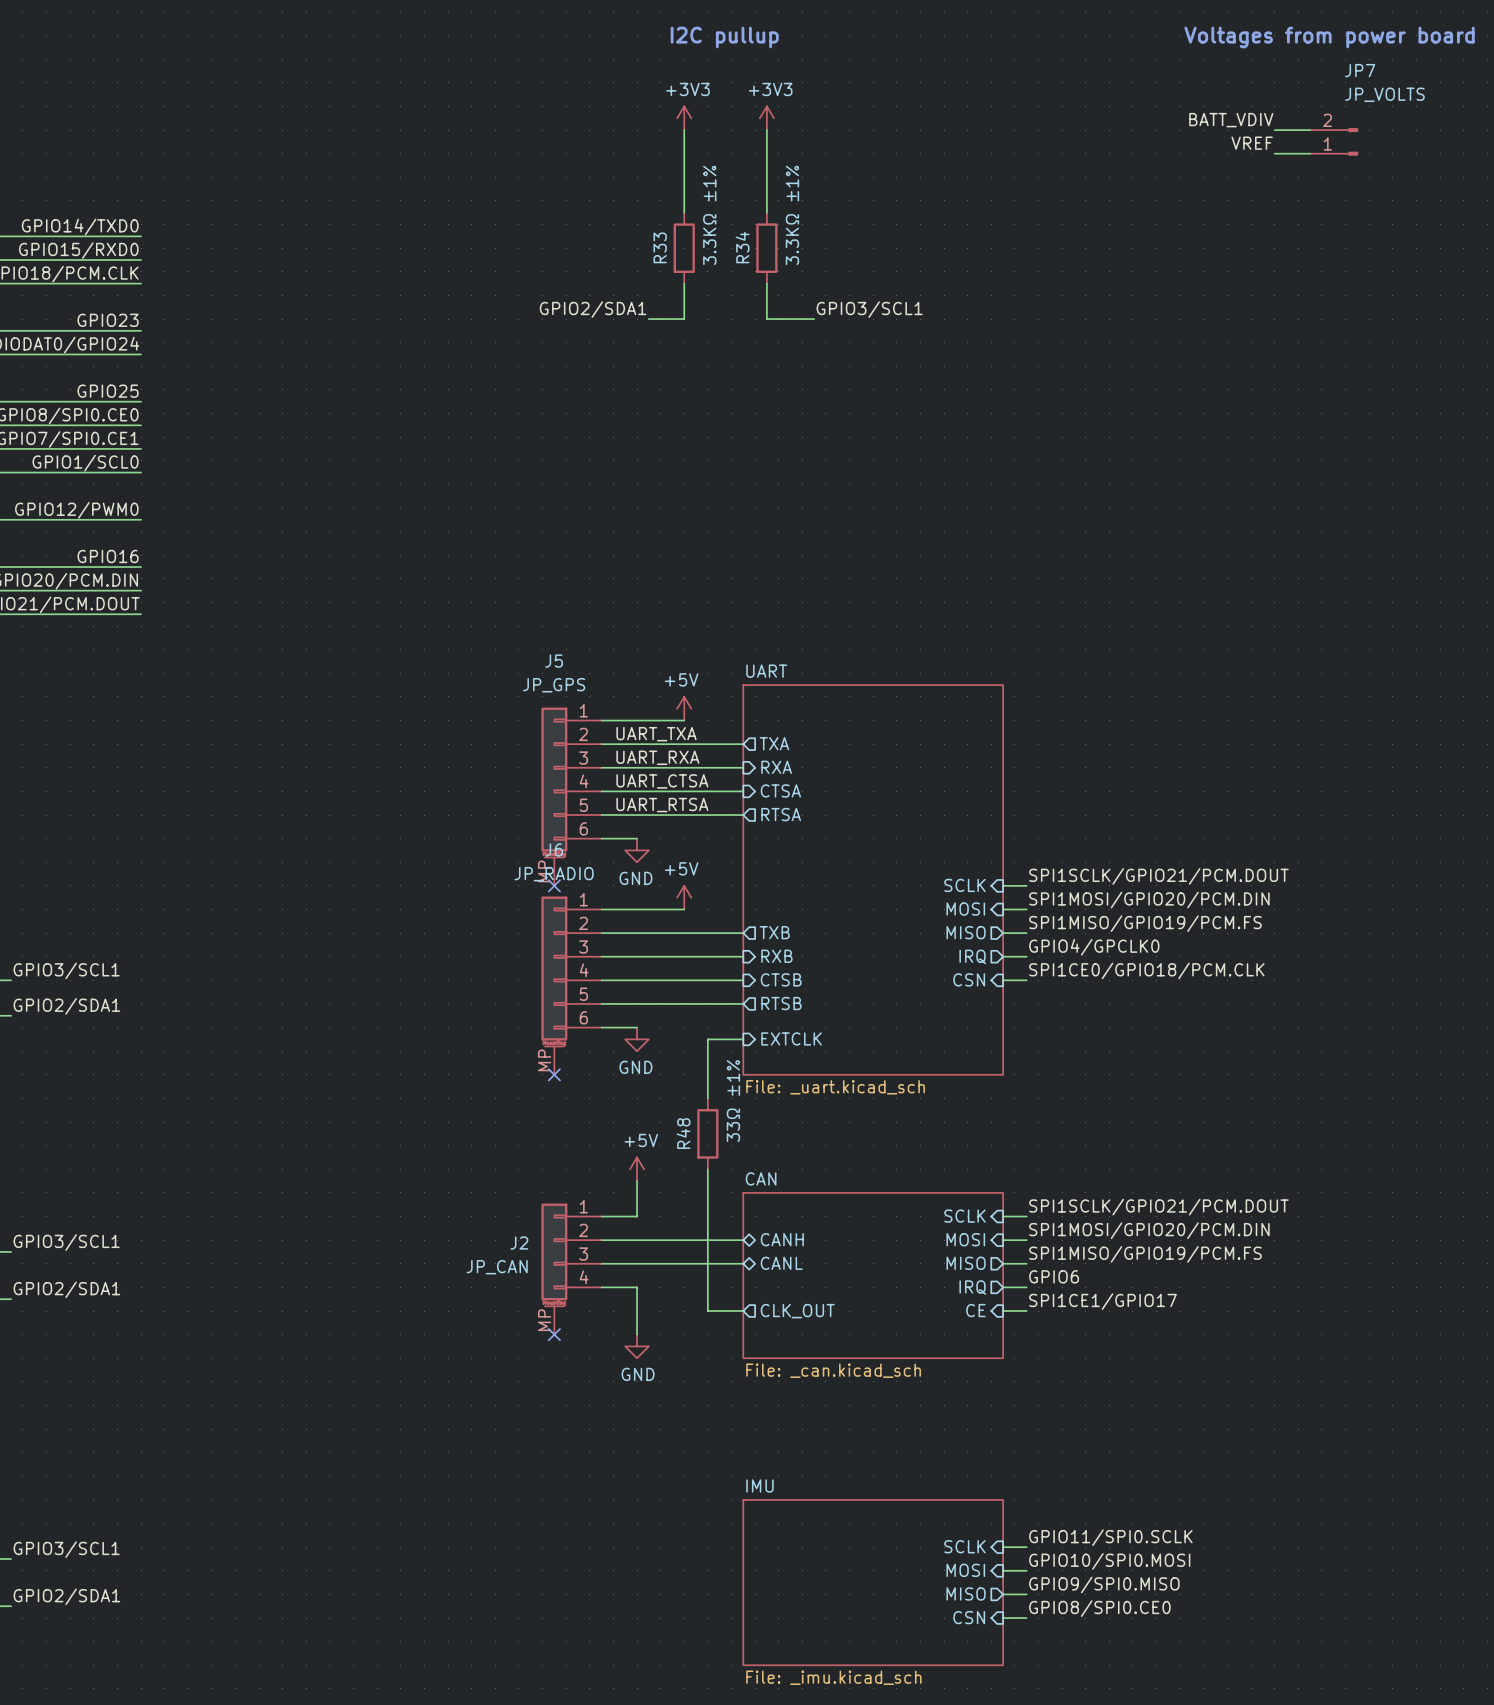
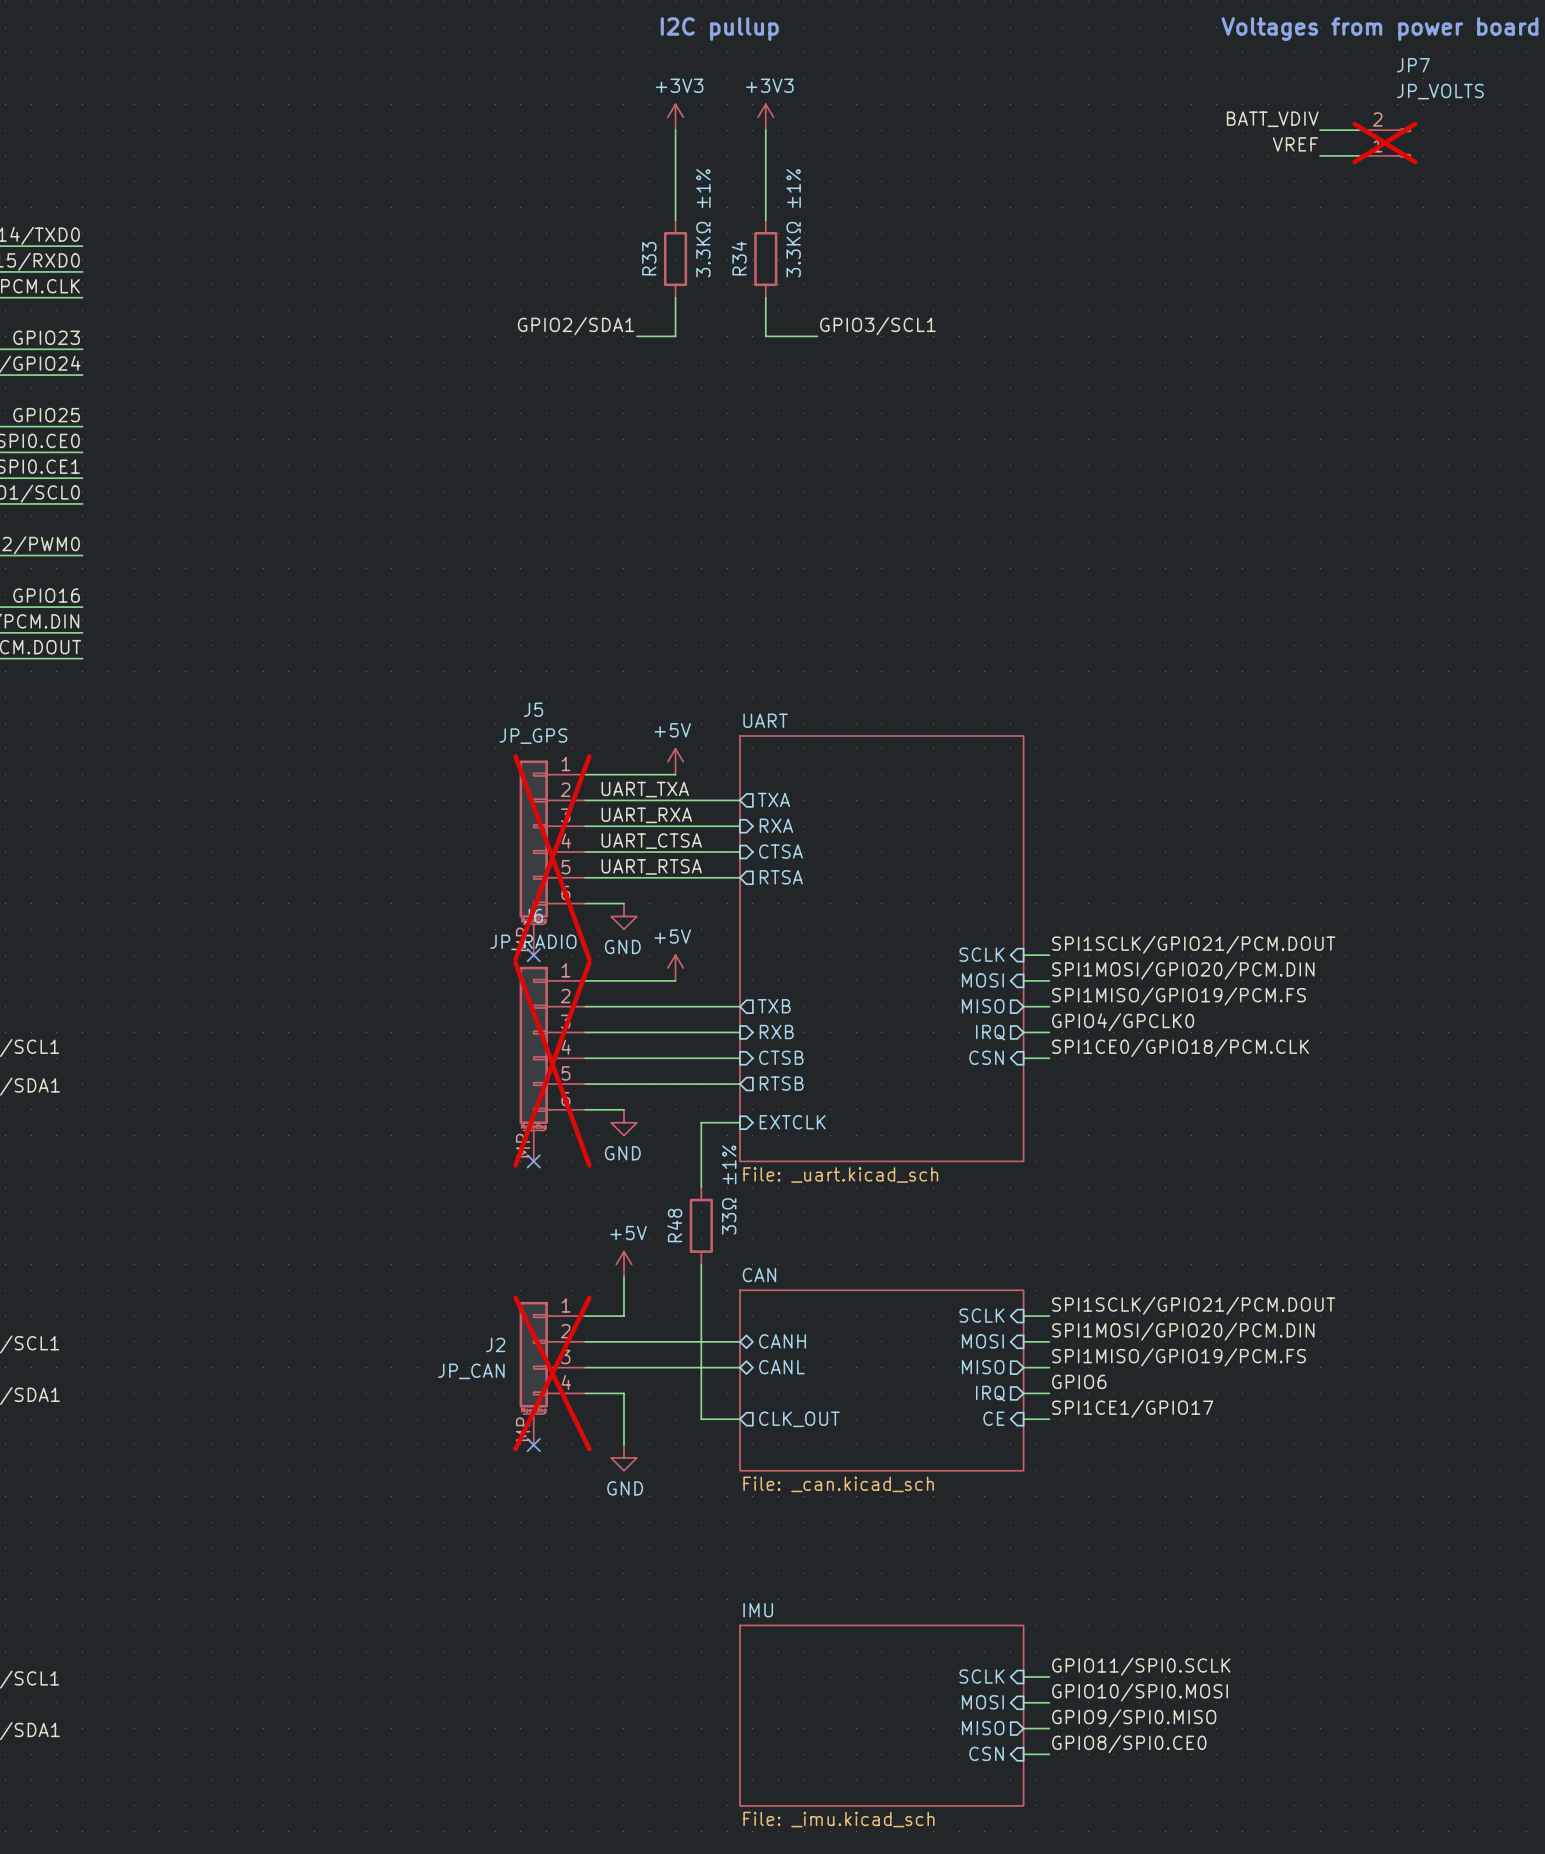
JP7 do-not-place cross: none -> (1384, 143)
J5 do-not-place cross: none -> (552, 857)
J6 do-not-place cross: none -> (552, 1064)
J2 do-not-place cross: none -> (552, 1373)

